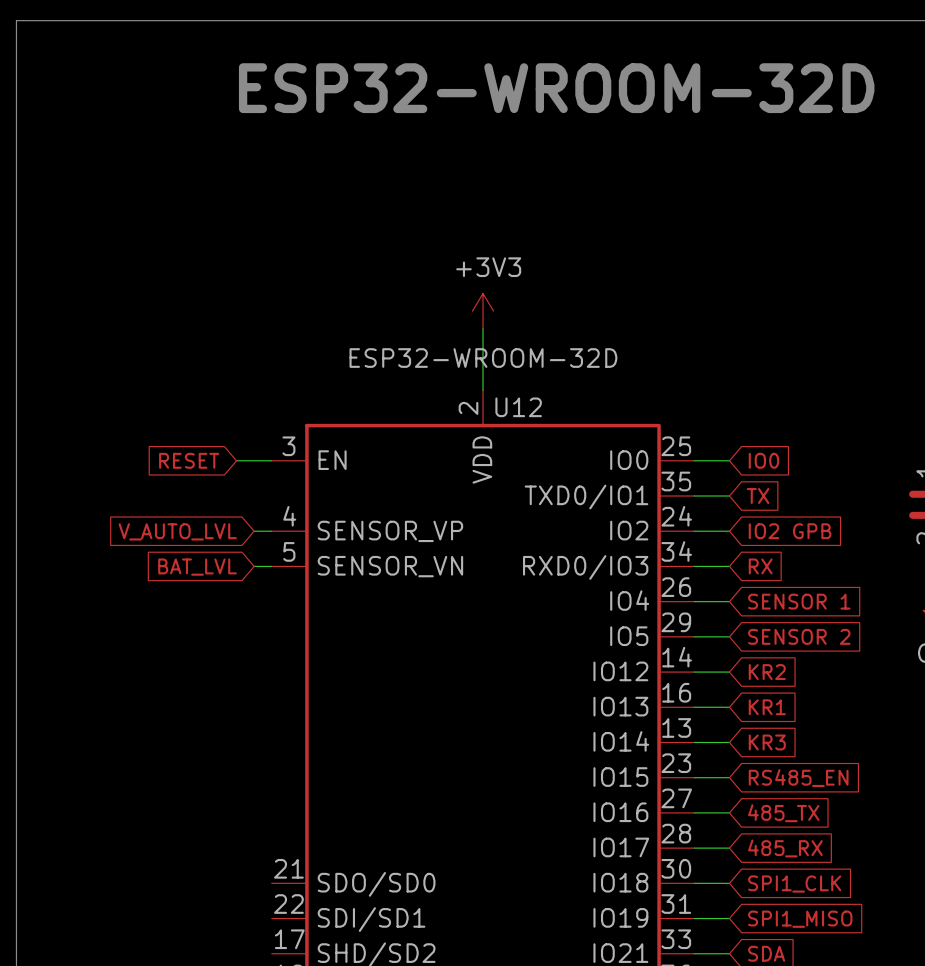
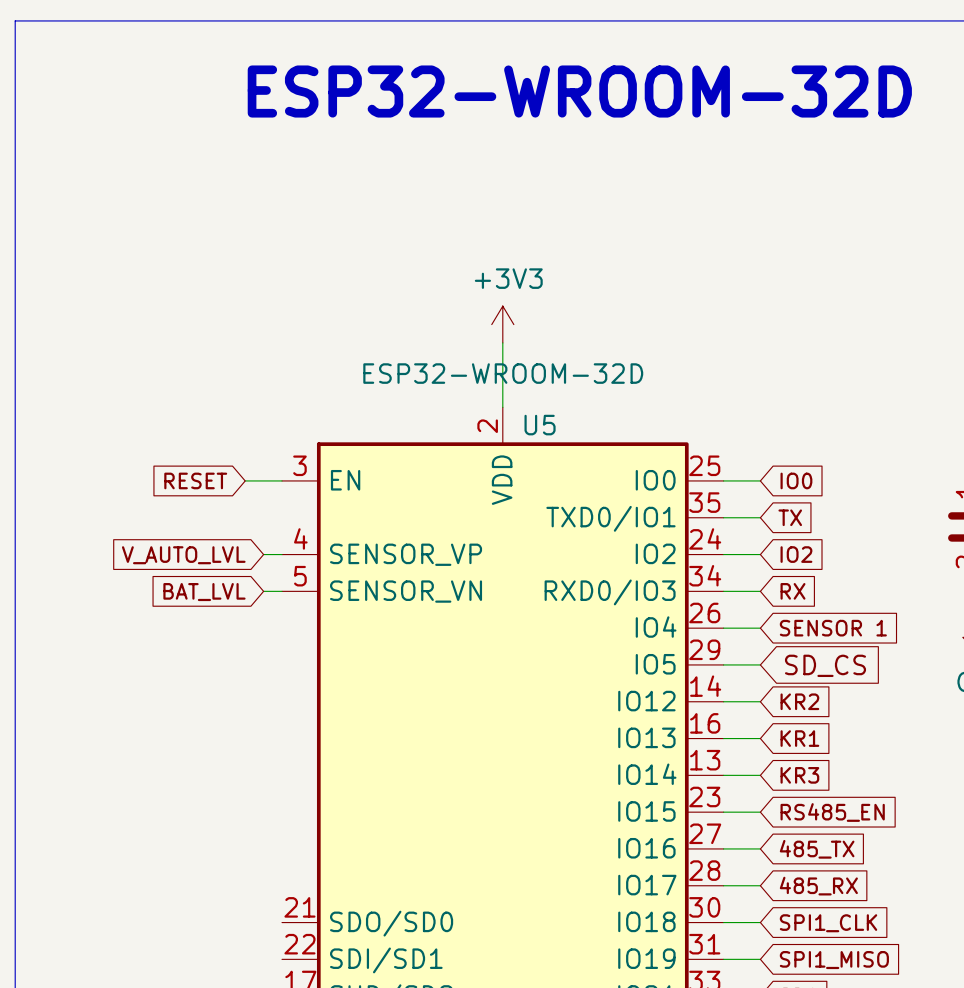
U12 name: U12 (518, 407) -> U5 (540, 425)
global label: IO2 GPB (790, 531) -> IO2 (796, 554)
global label: SENSOR 2 (799, 636) -> SD_CS (825, 665)

